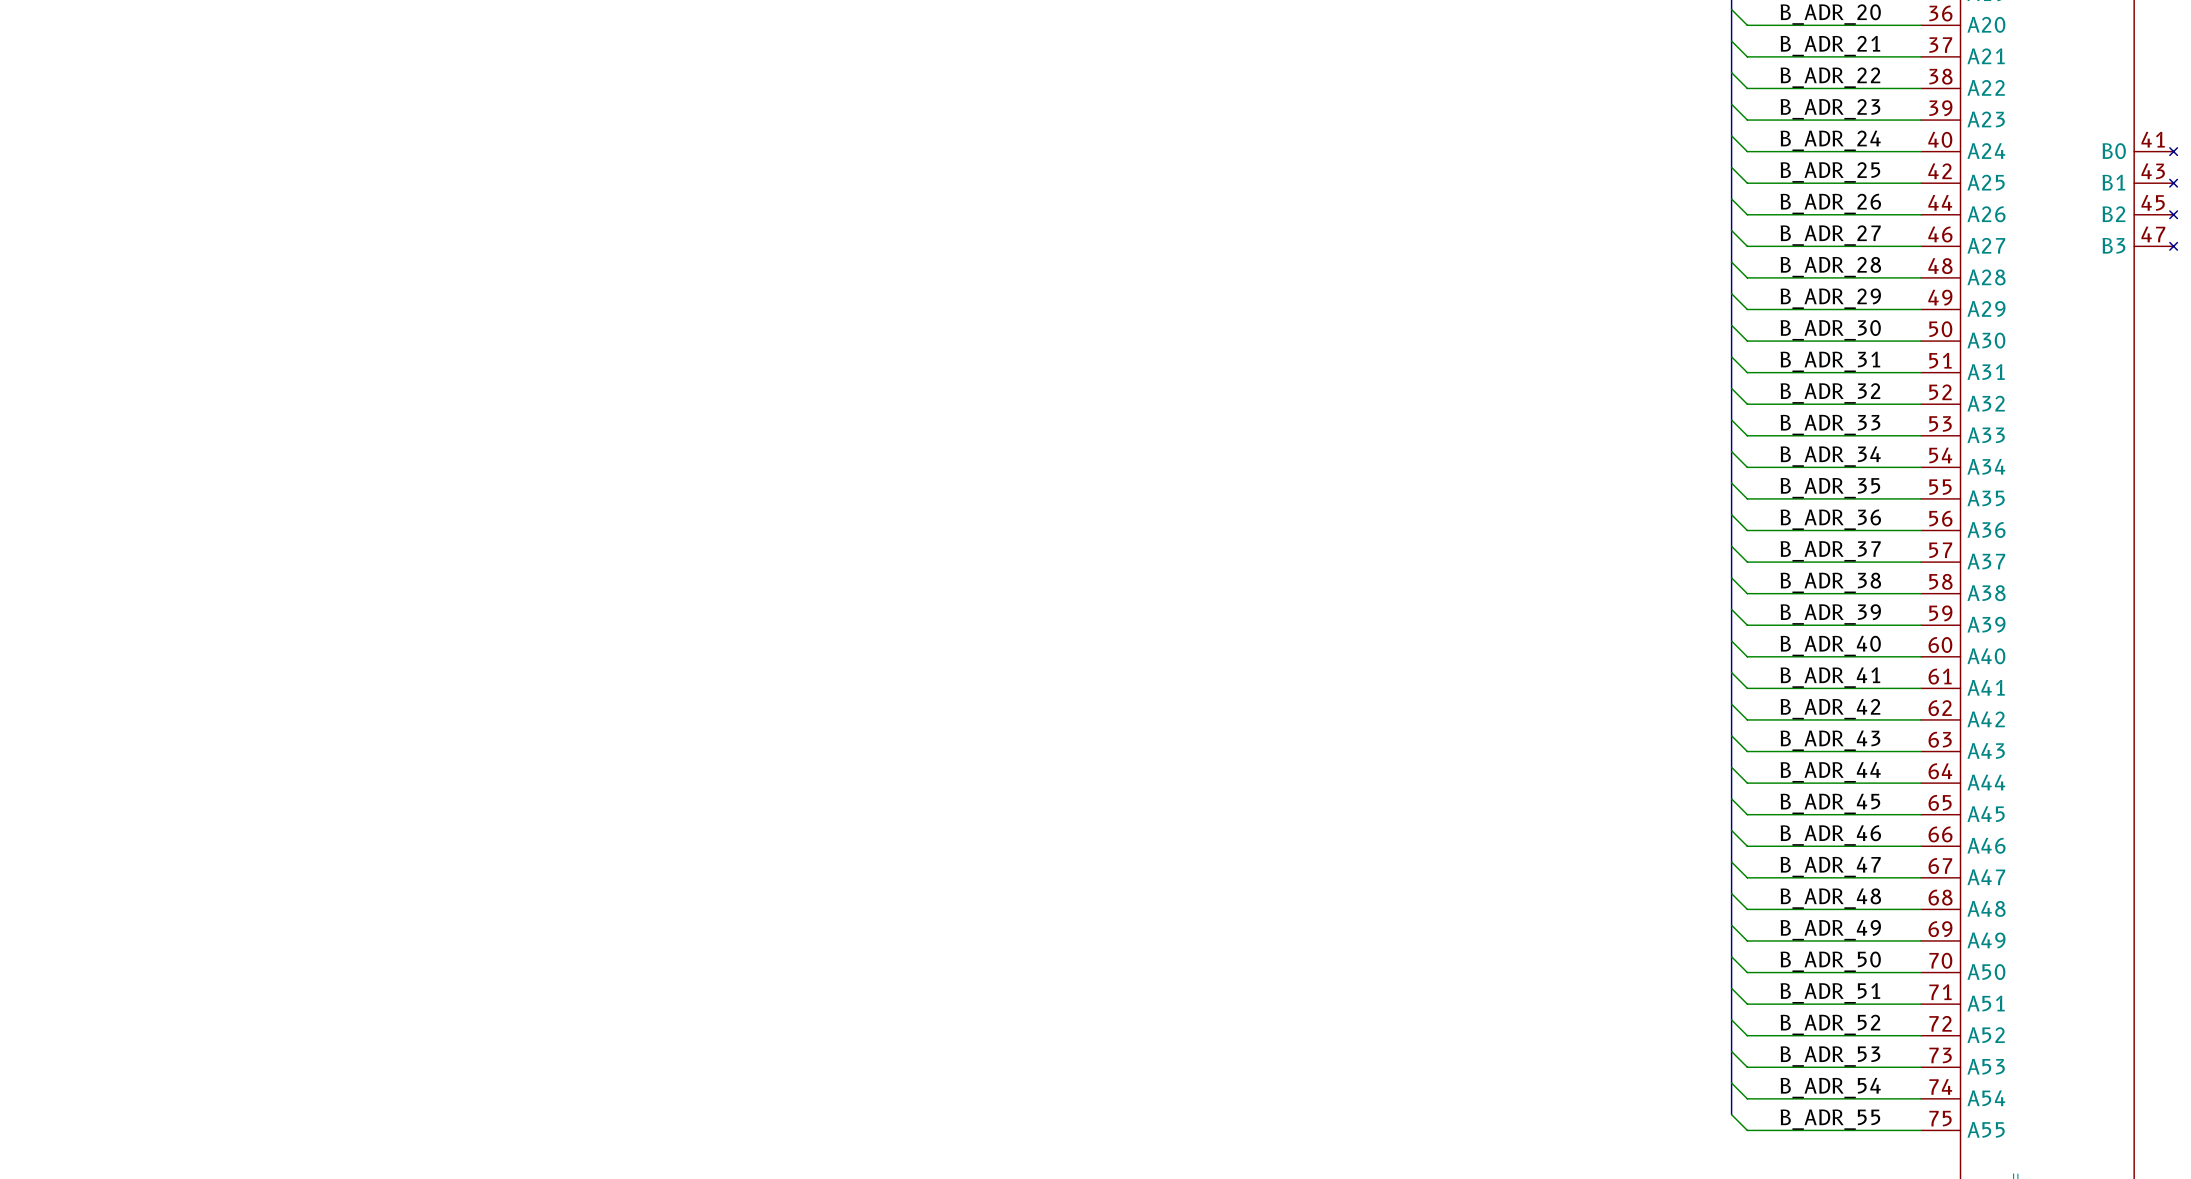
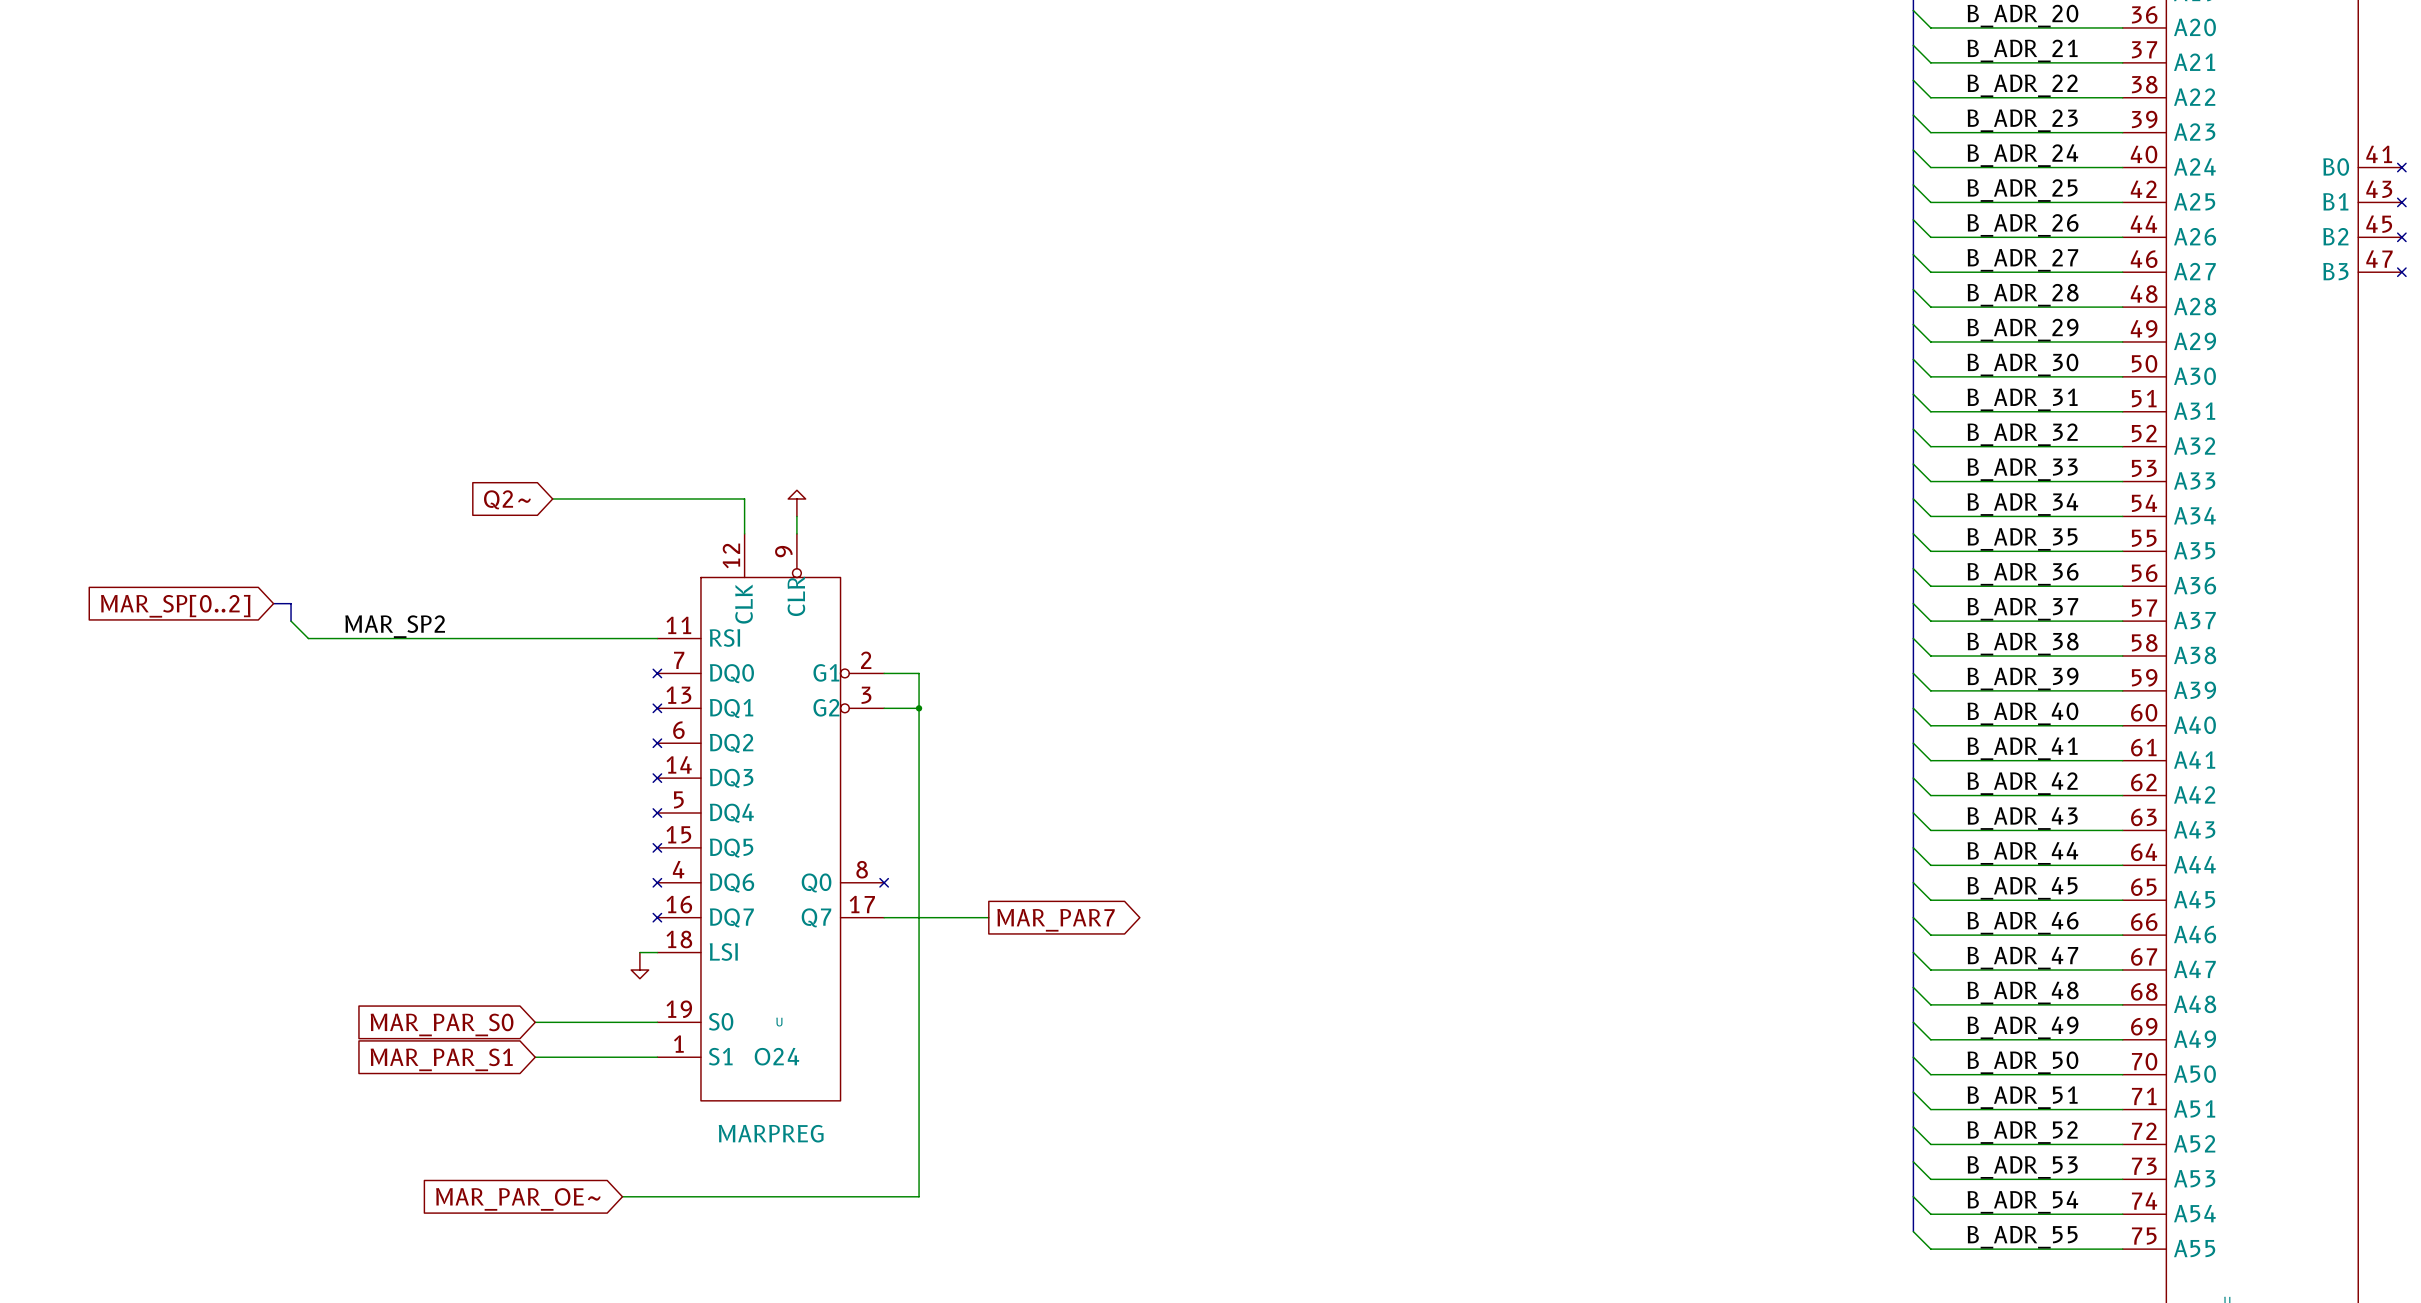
wire: none -> (552, 498) (744, 498) (744, 533)
global label: none -> Q2~ (507, 499)
power symbol: none -> (796, 503)
wire: none -> (796, 516) (796, 533)
bus: none -> (273, 603) (291, 603) (291, 621)
global label: none -> MAR_SP[0..2] (175, 606)
wire: none -> (291, 621) (308, 638) (657, 638)
label: none -> MAR_SP2 (395, 626)
no-connect mark: none -> (657, 673)
wire: none -> (884, 673) (919, 673) (919, 1196) (622, 1196)
no-connect mark: none -> (657, 708)
wire: none -> (884, 708) (919, 708)
junction: none -> (919, 708)
no-connect mark: none -> (657, 743)
no-connect mark: none -> (657, 778)
no-connect mark: none -> (657, 813)
U: none -> (770, 817)
no-connect mark: none -> (657, 847)
no-connect mark: none -> (657, 882)
no-connect mark: none -> (884, 882)
no-connect mark: none -> (657, 917)
wire: none -> (884, 917) (988, 917)
global label: none -> MAR_PAR7 (1056, 920)
wire: none -> (639, 952) (657, 952)
power symbol: none -> (639, 965)
wire: none -> (535, 1022) (657, 1022)
global label: none -> MAR_PAR_S0 (442, 1024)
wire: none -> (535, 1057) (657, 1057)
global label: none -> MAR_PAR_S1 (441, 1059)
global label: none -> MAR_PAR_OE~ (518, 1199)

